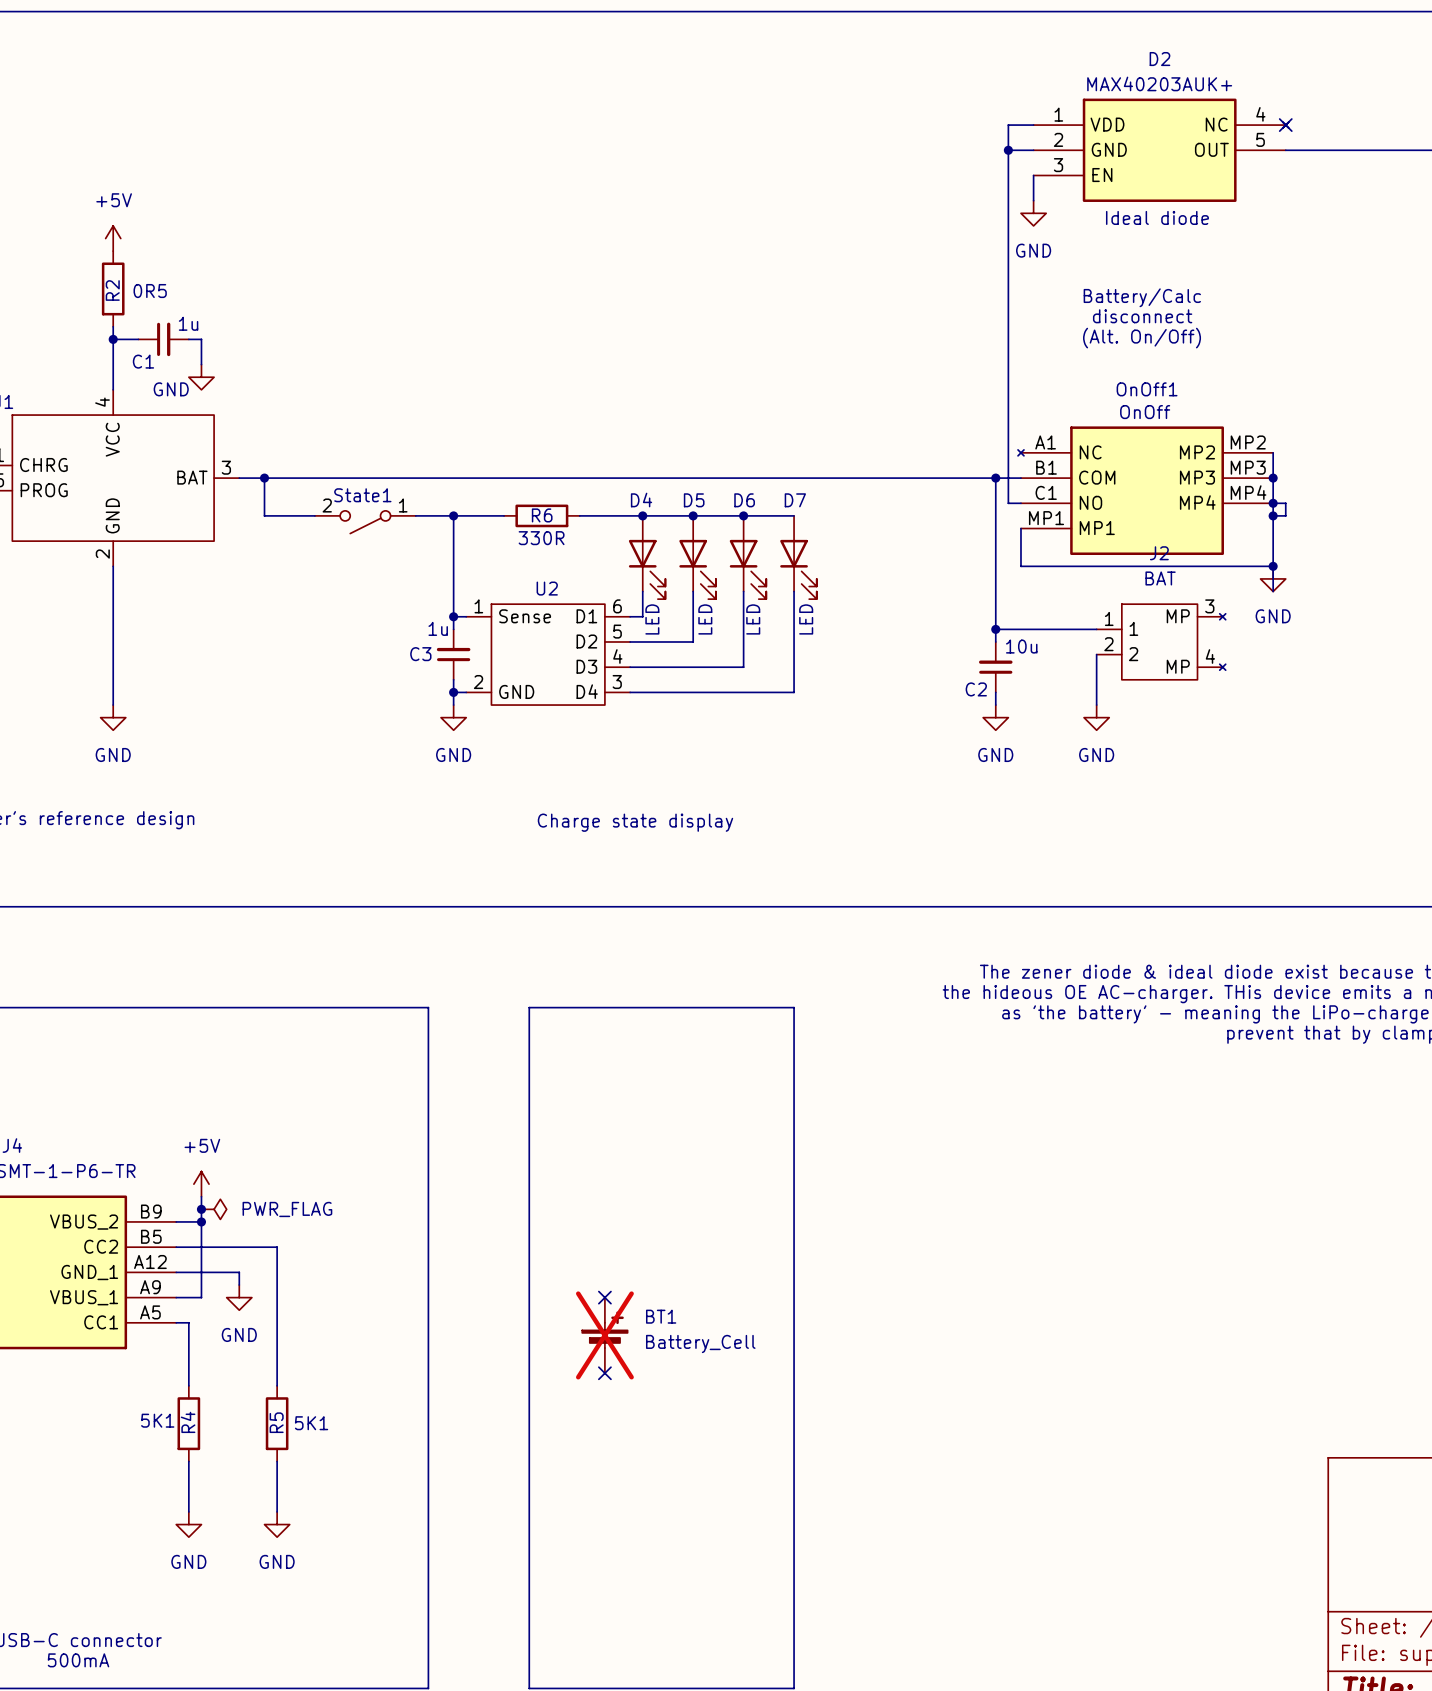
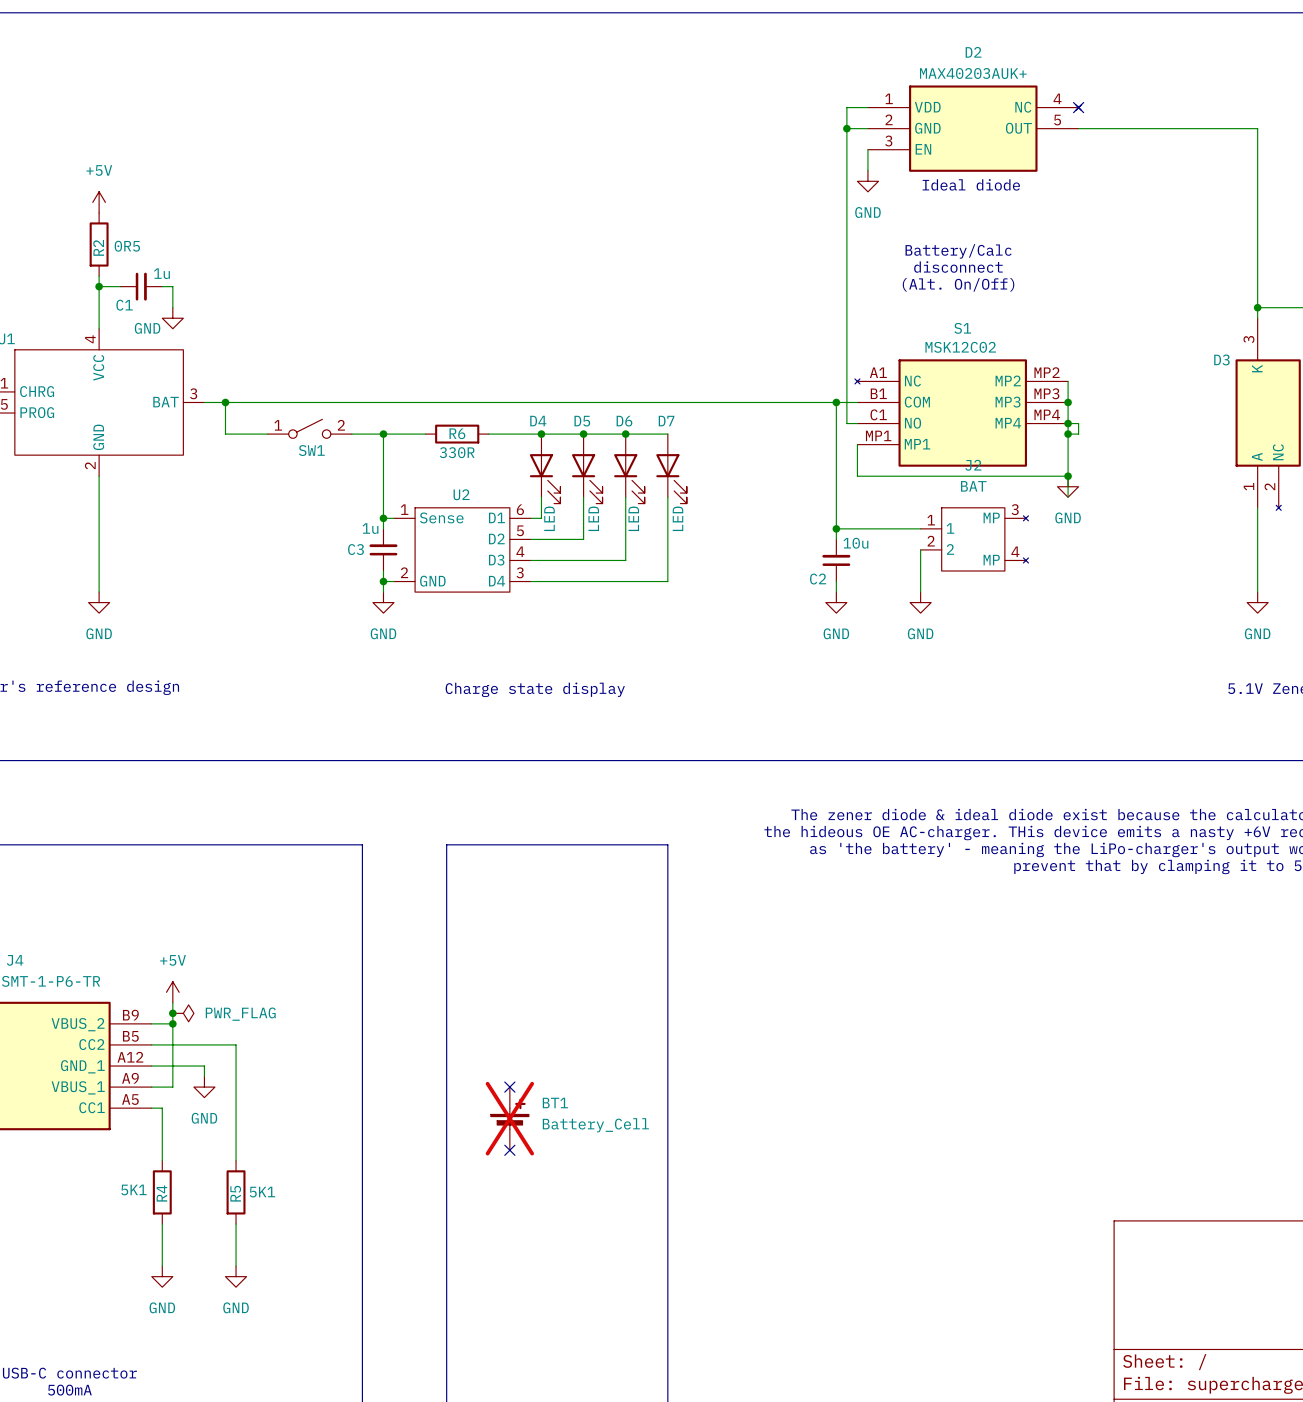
OnOff1 name: OnOff1 (1147, 389) -> S1 (962, 328)
OnOff1 value: OnOff (1145, 412) -> MSK12C02 (960, 347)
SW1: none -> (309, 428)
State1: (365, 522) -> none

